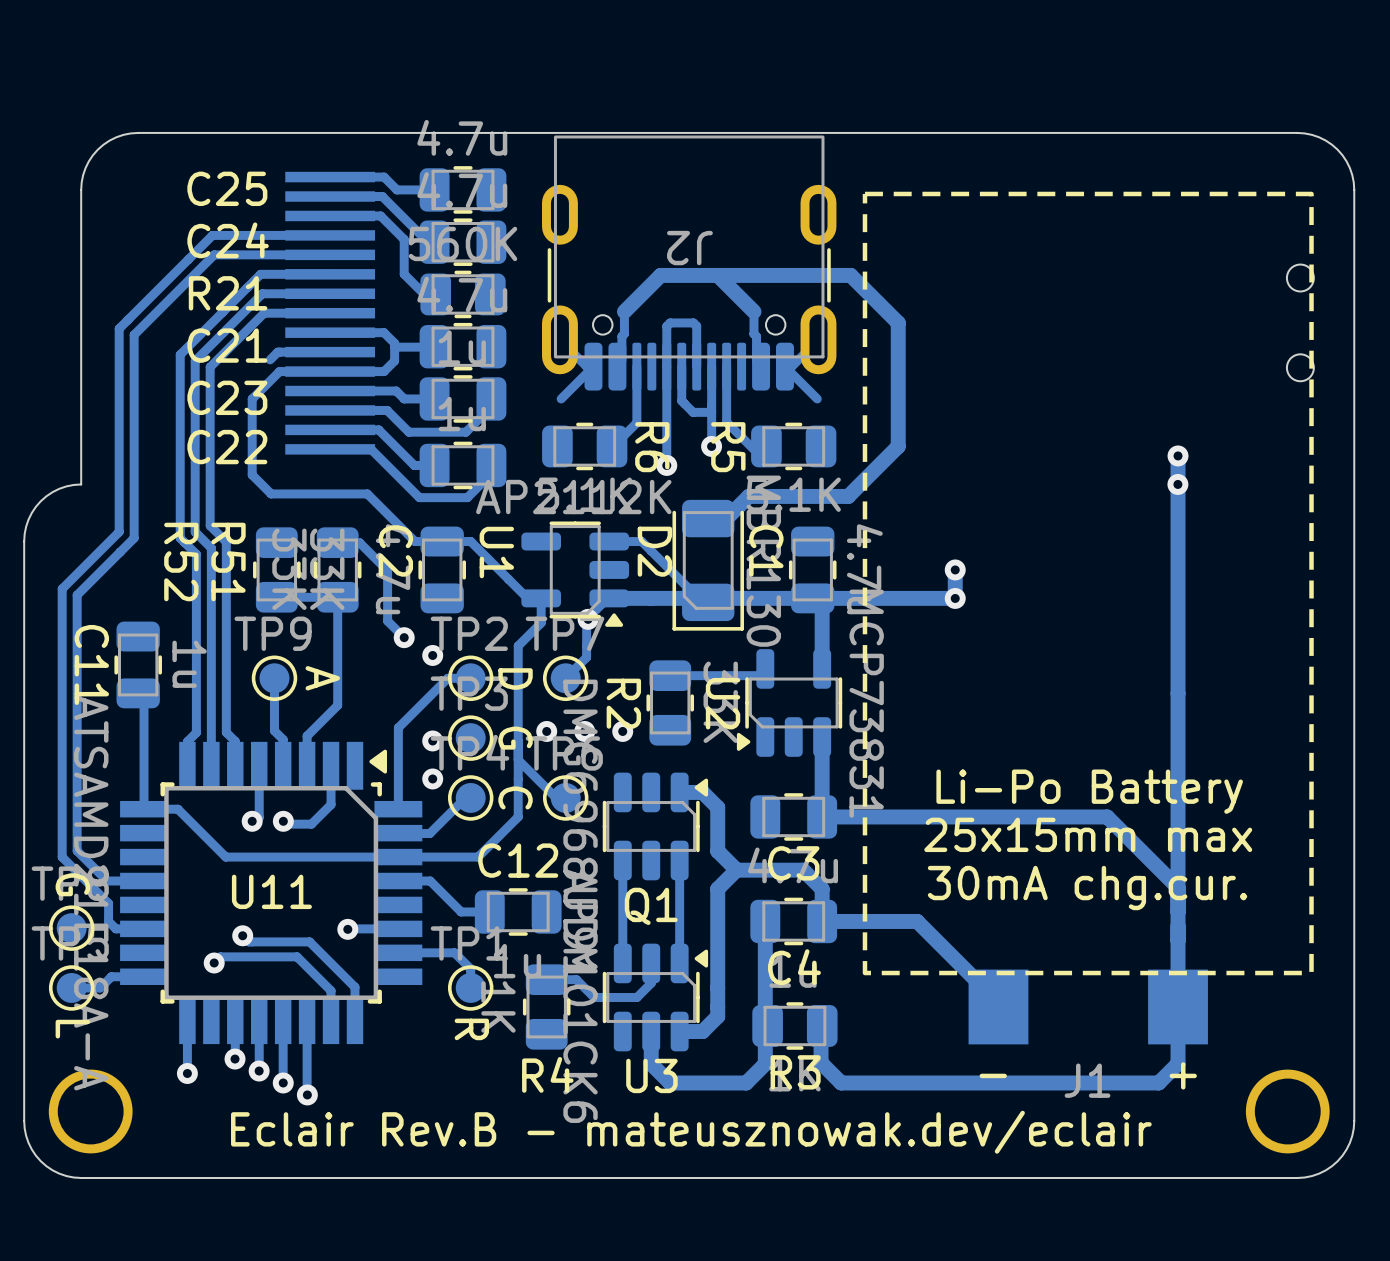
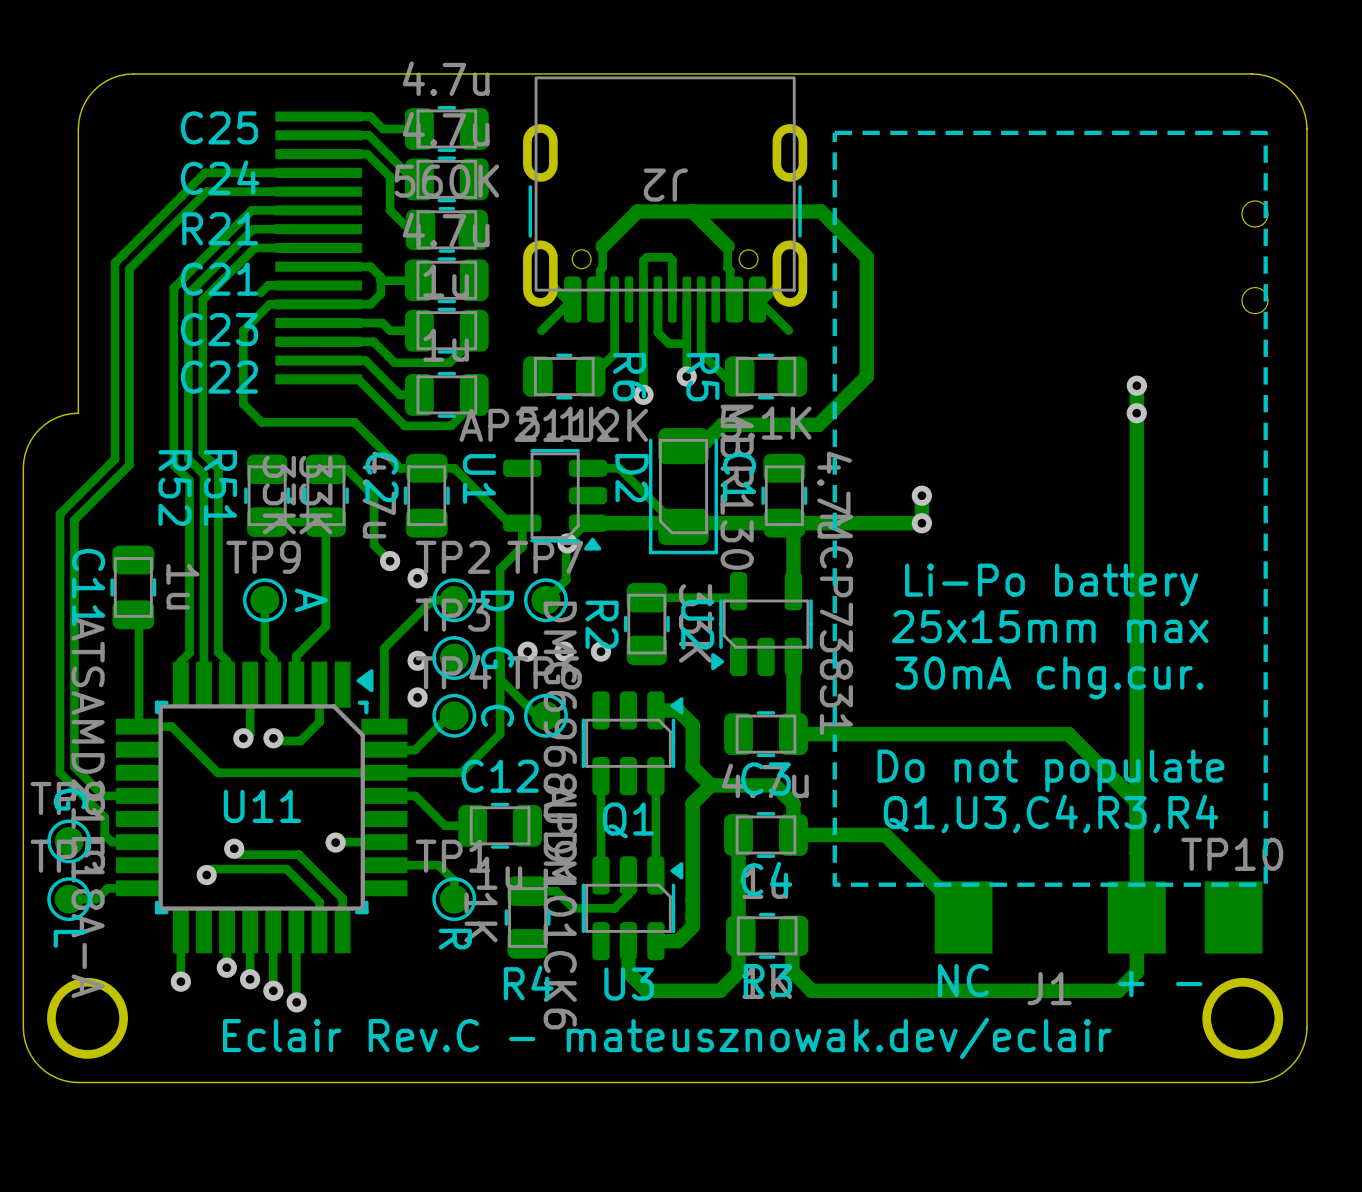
text: none -> Li-Po battery (1051, 584)
text: none -> 25x15mm max (1050, 626)
text: none -> 30mA chg.cur. (1049, 677)
J1 text: Li-Po Battery (1089, 791) -> none
J1 text: 25x15mm max (1088, 834) -> none
text: none -> Do not populate (1050, 770)
J1 text: 30mA chg.cur. (1087, 888) -> none
text: none -> Q1,U3,C4,R3,R4 (1050, 813)
TP10: none -> (1233, 917)
text: - (993, 1075) -> NC (963, 980)
text: + (1183, 1075) -> + - (1160, 984)
text: Eclair Rev.B - mateusznowak.dev/eclair (691, 1132) -> Eclair Rev.C - mateusznowak.dev/eclair (667, 1038)

